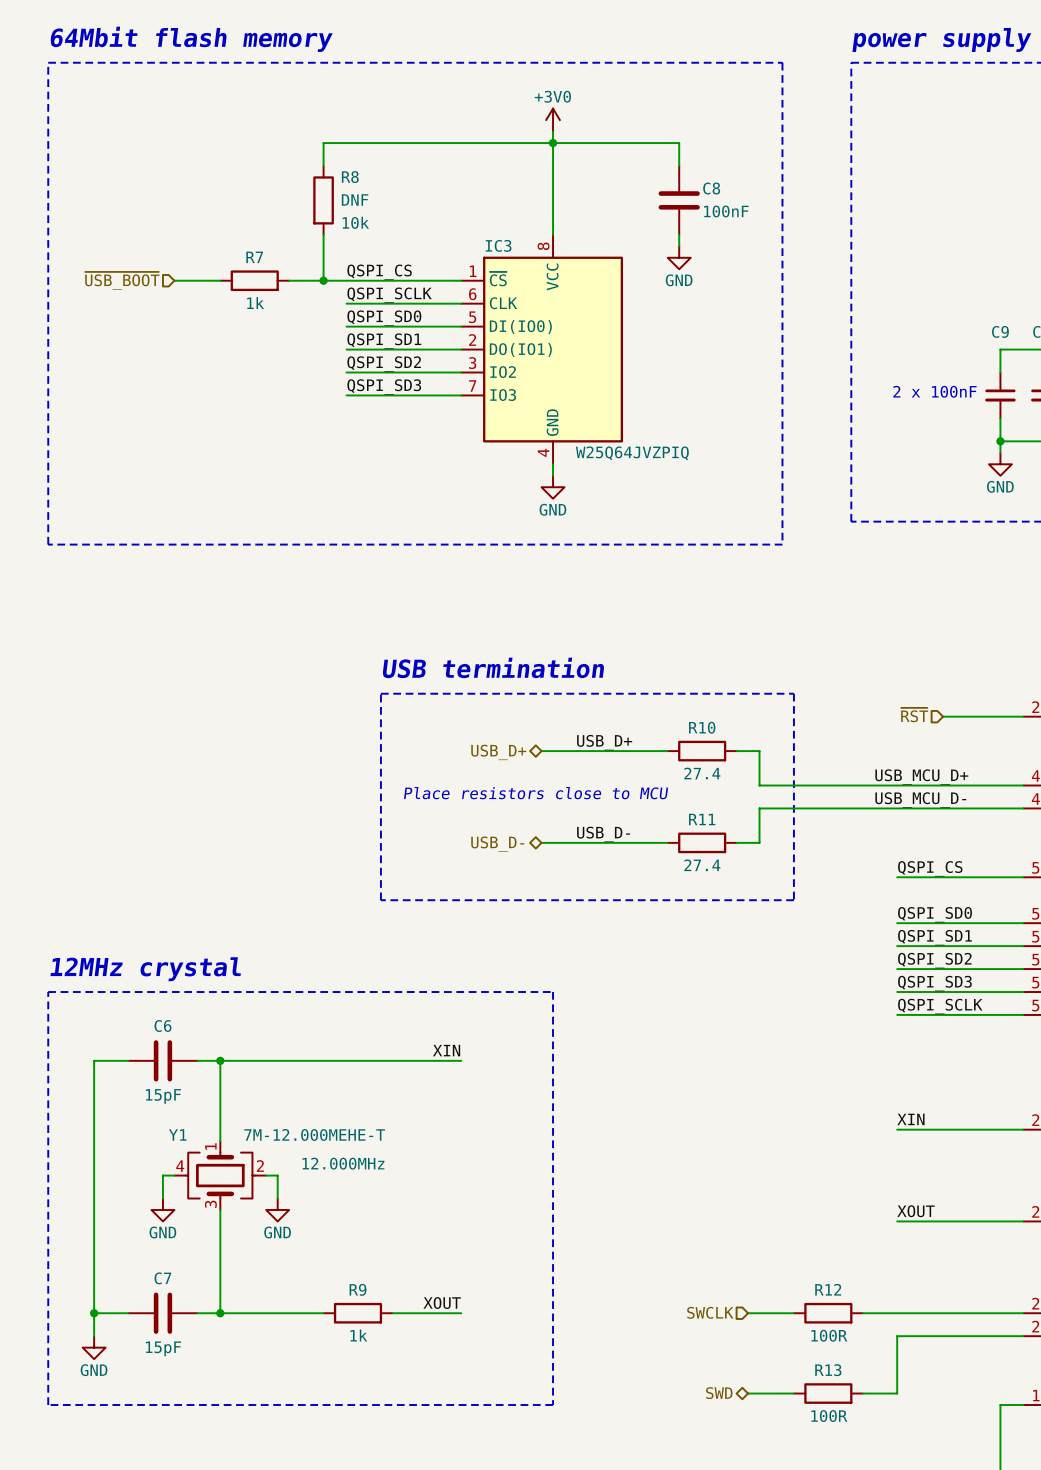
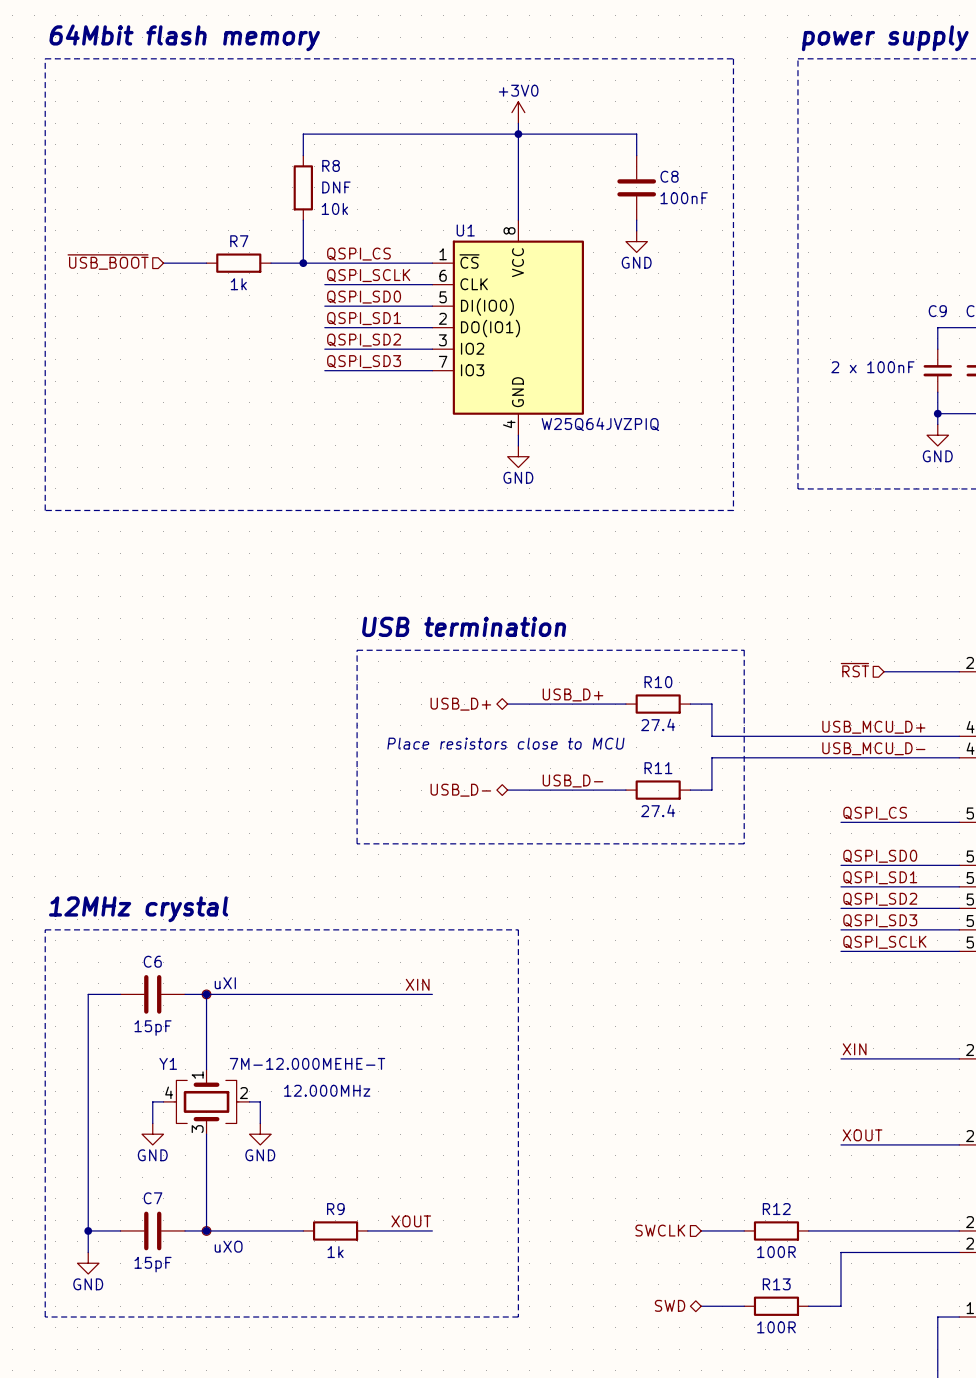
IC3 name: IC3 (498, 245) -> U1 (465, 230)
part: none -> uXI (206, 994)
part: none -> uXO (206, 1230)

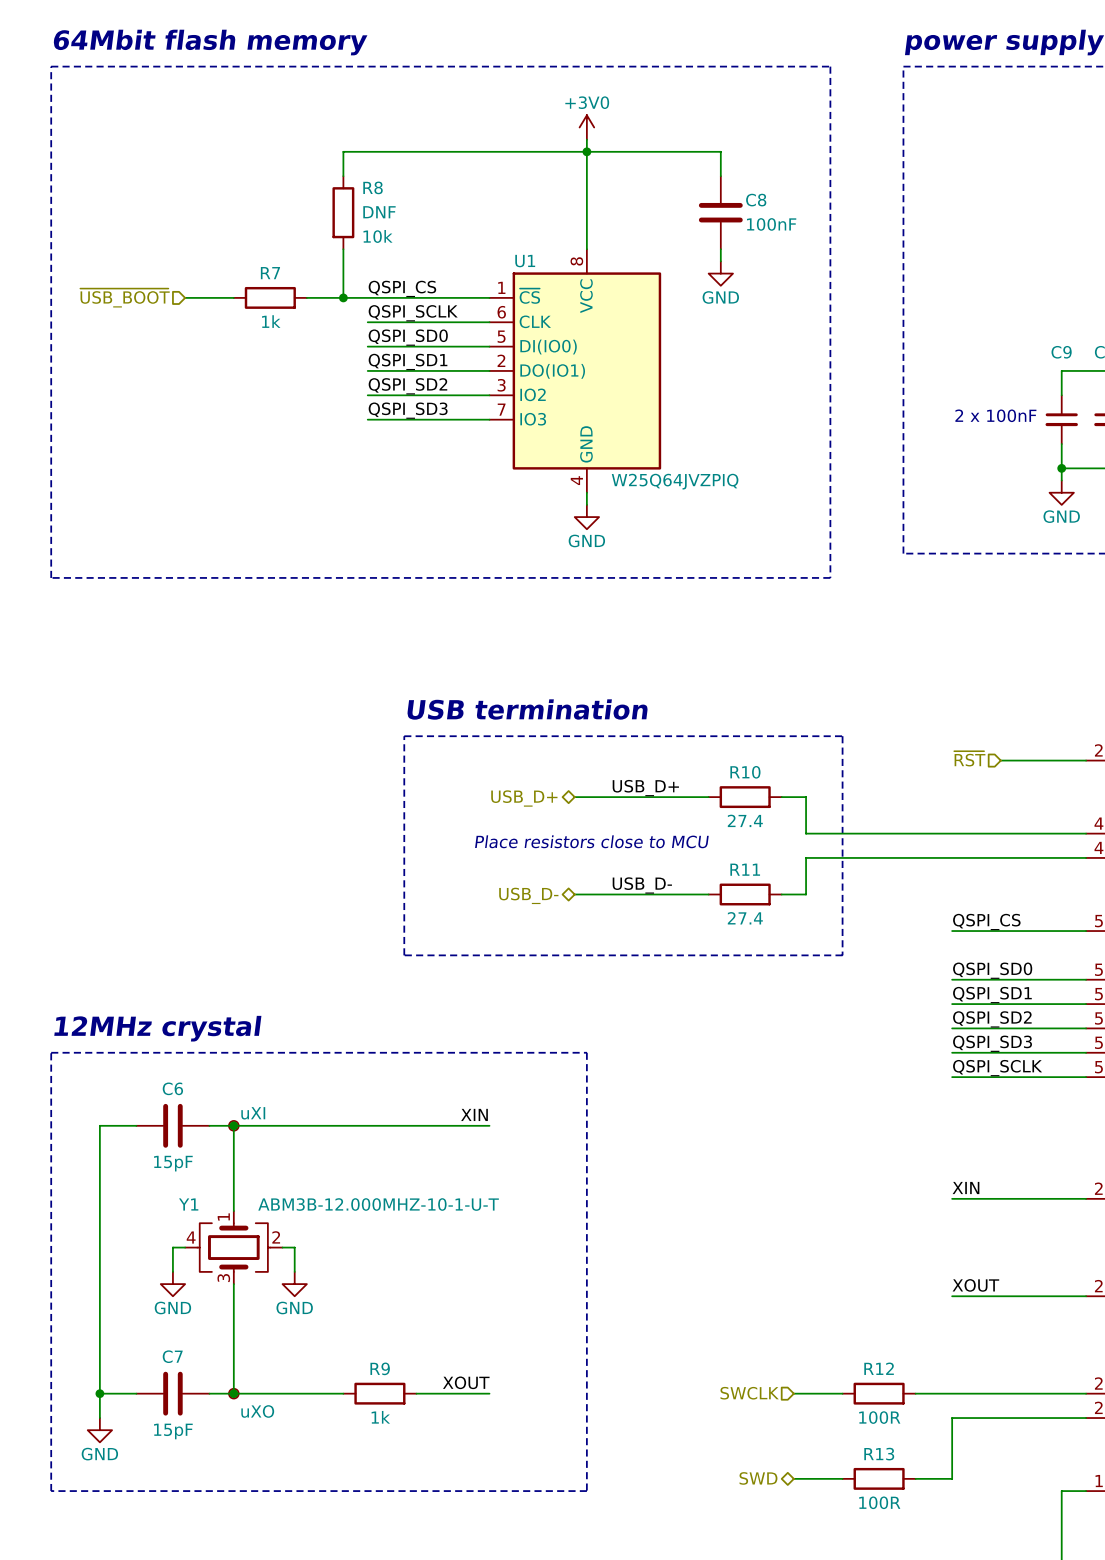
label: USB_MCU_D+ (873, 727) -> none
label: USB_MCU_D- (873, 748) -> none
Y1 value: 7M-12.000MEHE-T (307, 1063) -> ABM3B-12.000MHZ-10-1-U-T (378, 1204)
Y1 text: 12.000MHz (327, 1090) -> none

